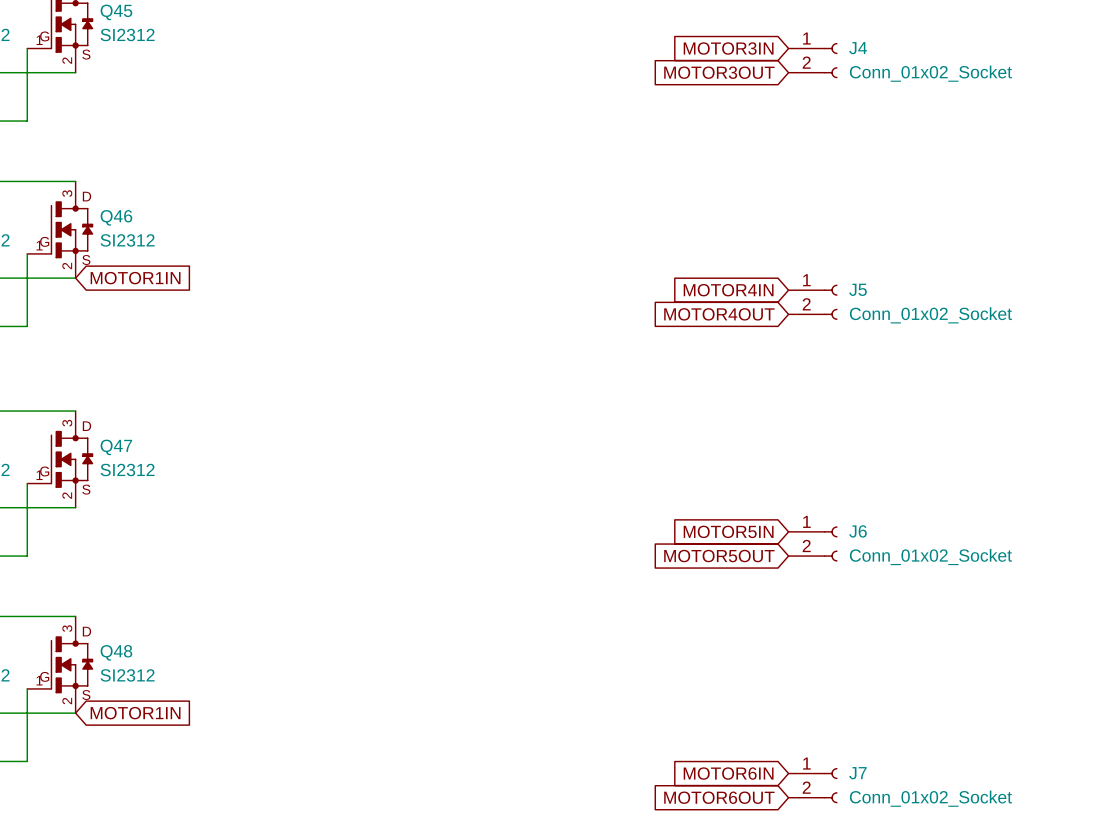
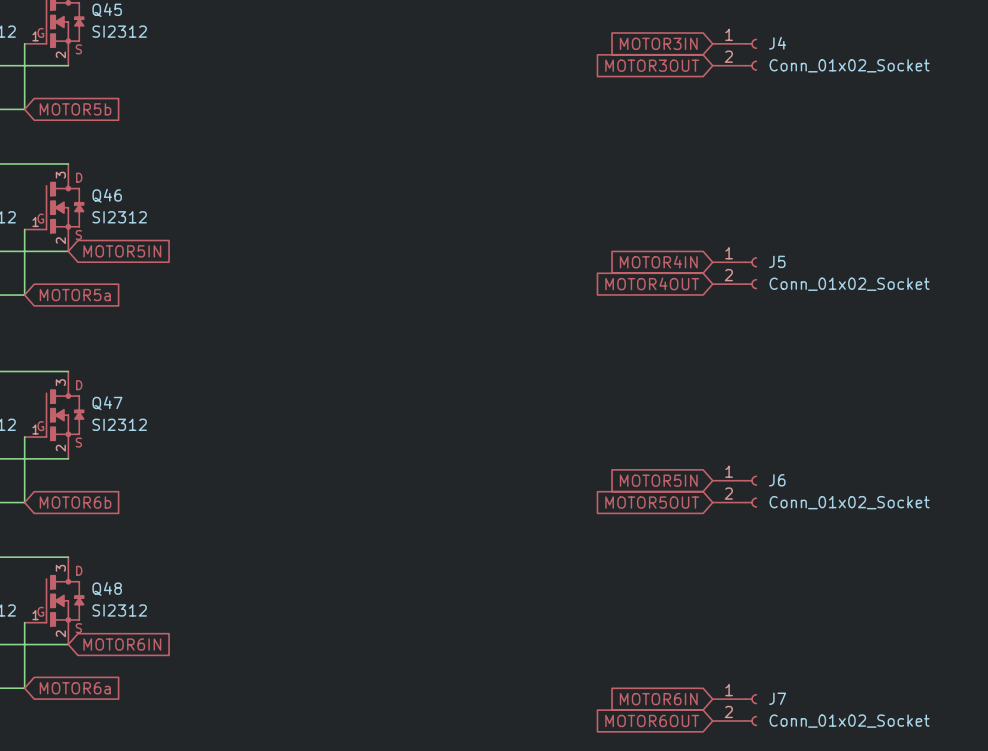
global label: none -> MOTOR5b (75, 109)
global label: MOTOR1IN (135, 278) -> MOTOR5IN (122, 251)
global label: none -> MOTOR5a (75, 295)
global label: none -> MOTOR6b (75, 502)
global label: MOTOR1IN (135, 713) -> MOTOR6IN (122, 644)
global label: none -> MOTOR6a (75, 688)

